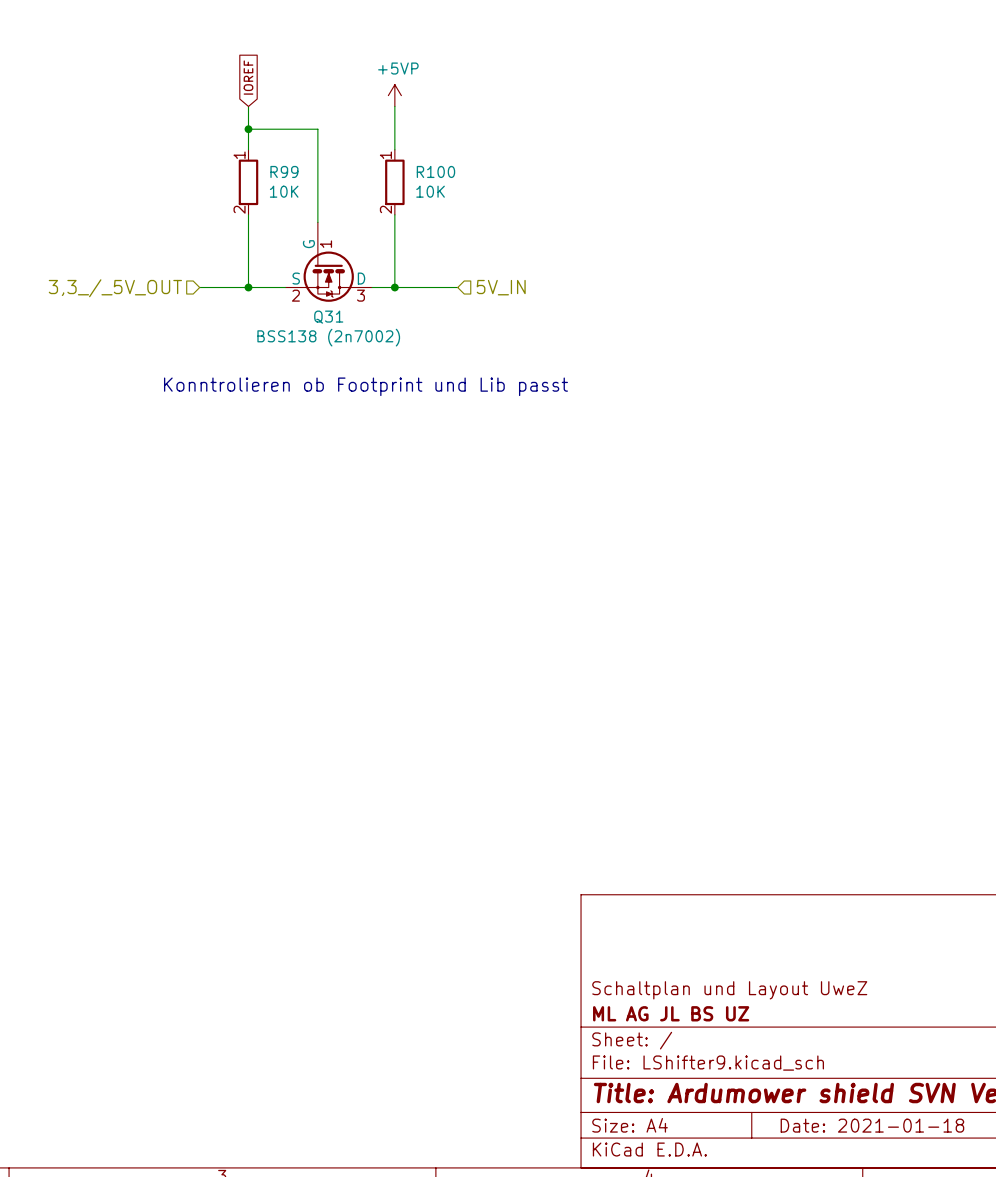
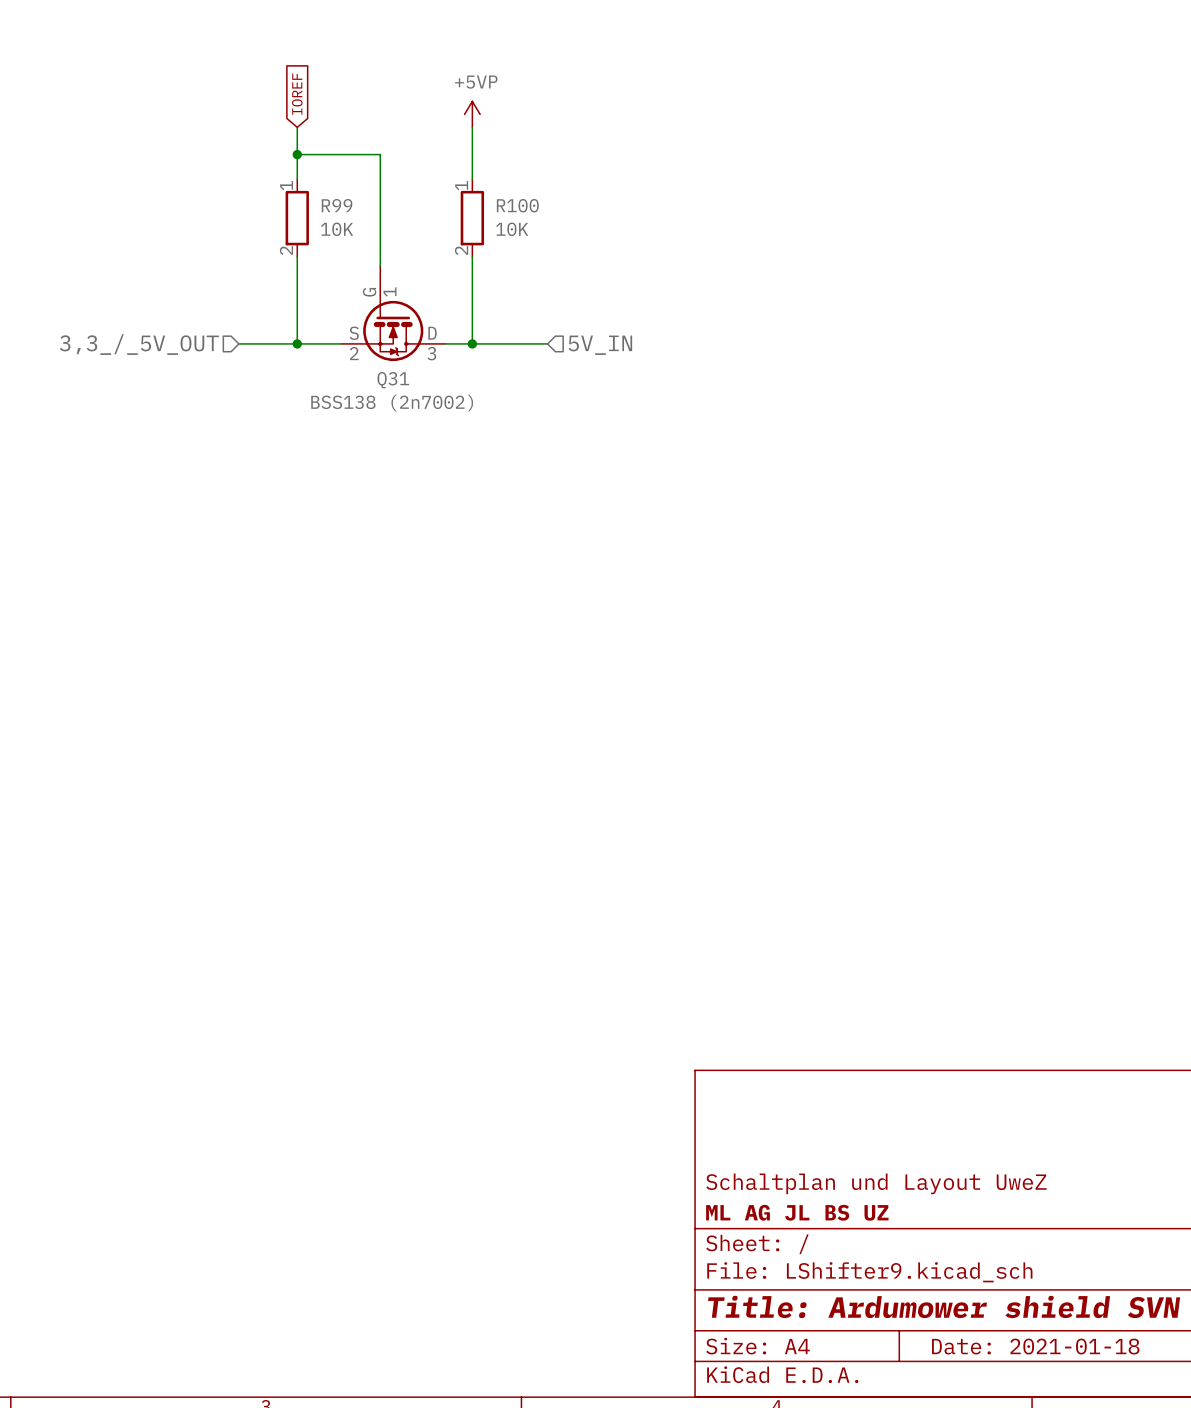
text: Konntrolieren ob Footprint und Lib passt (365, 386) -> none

